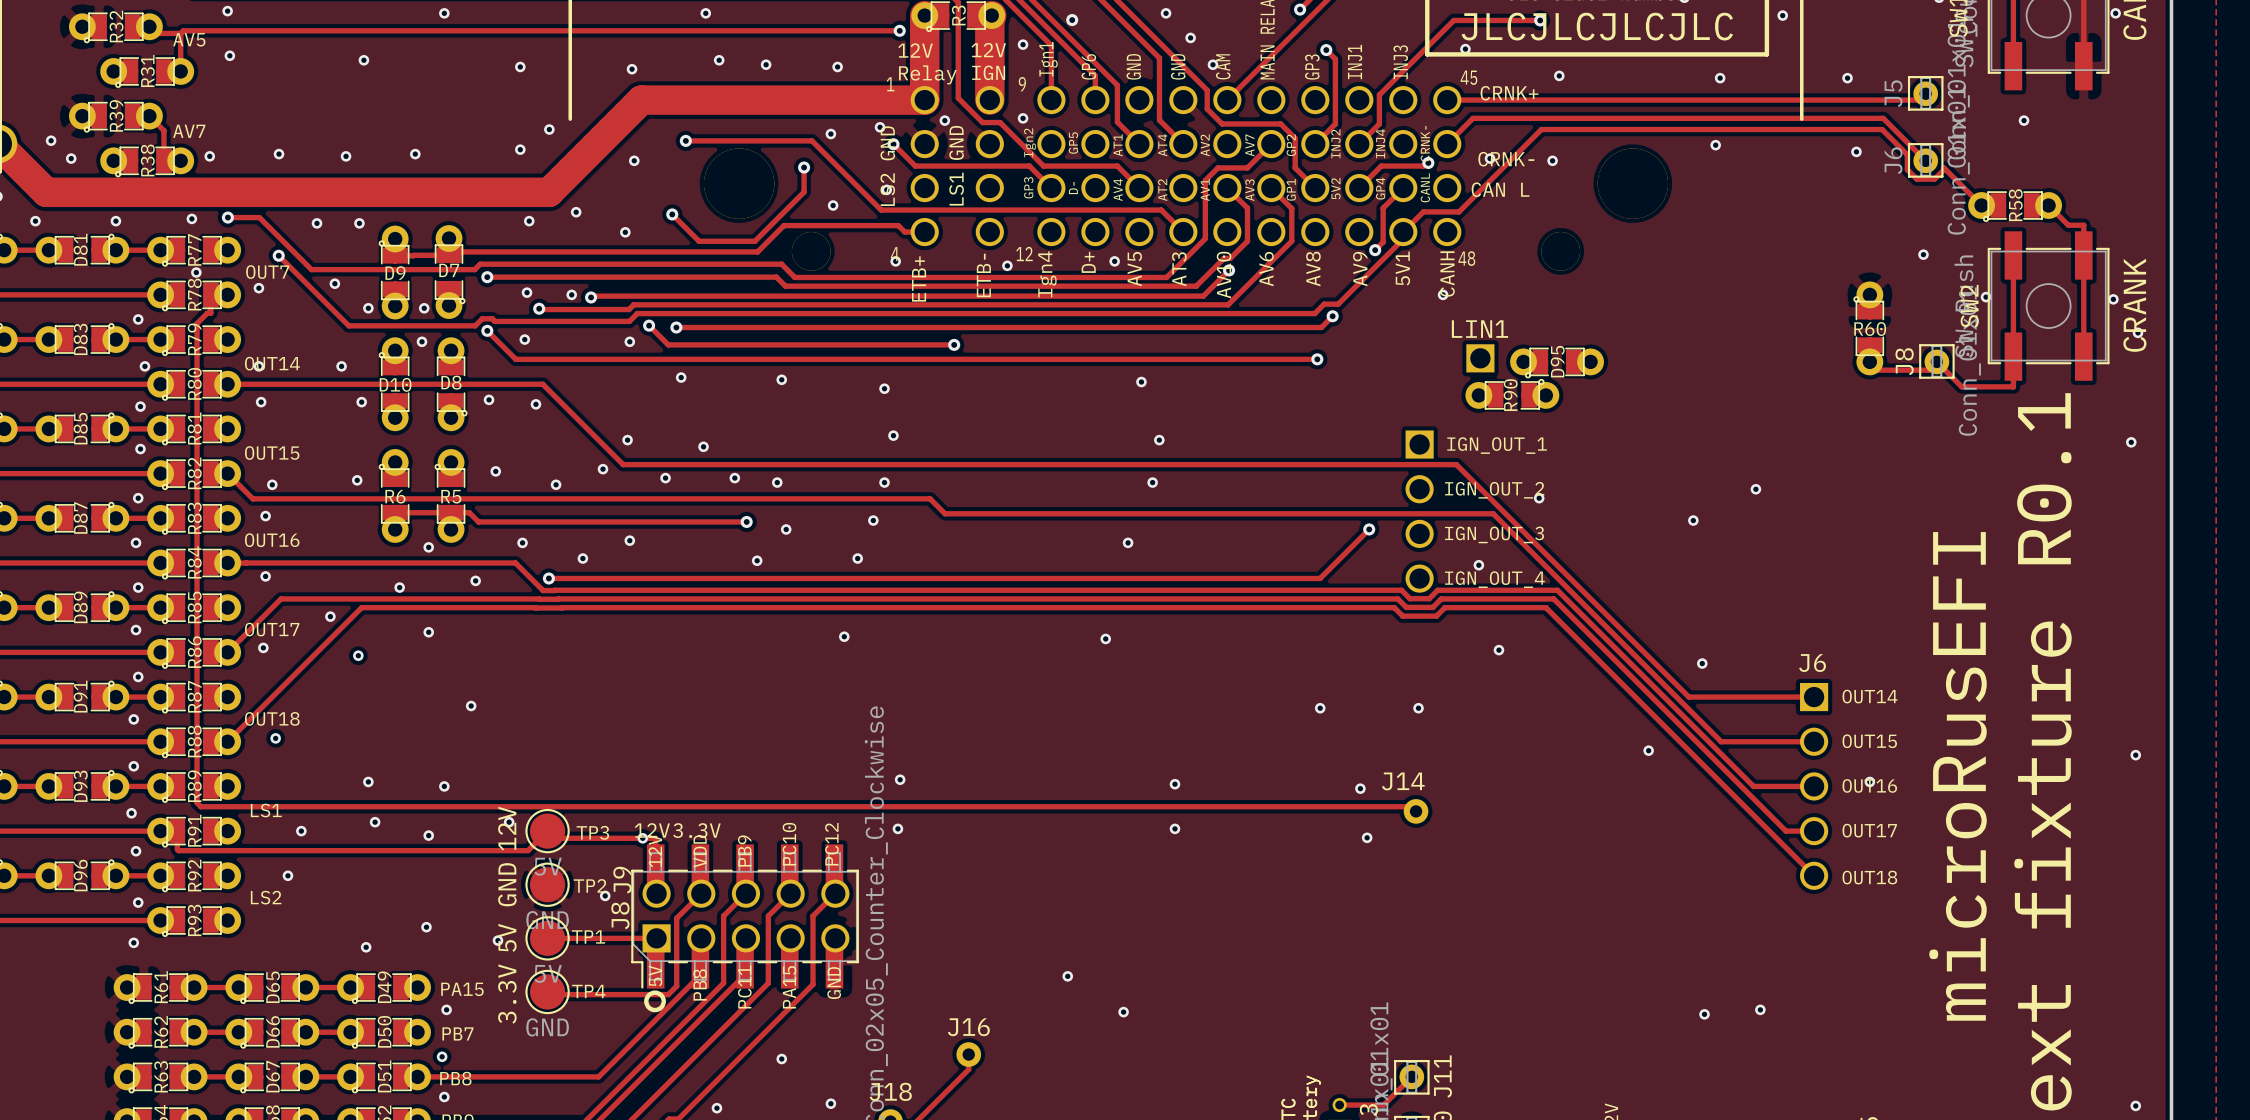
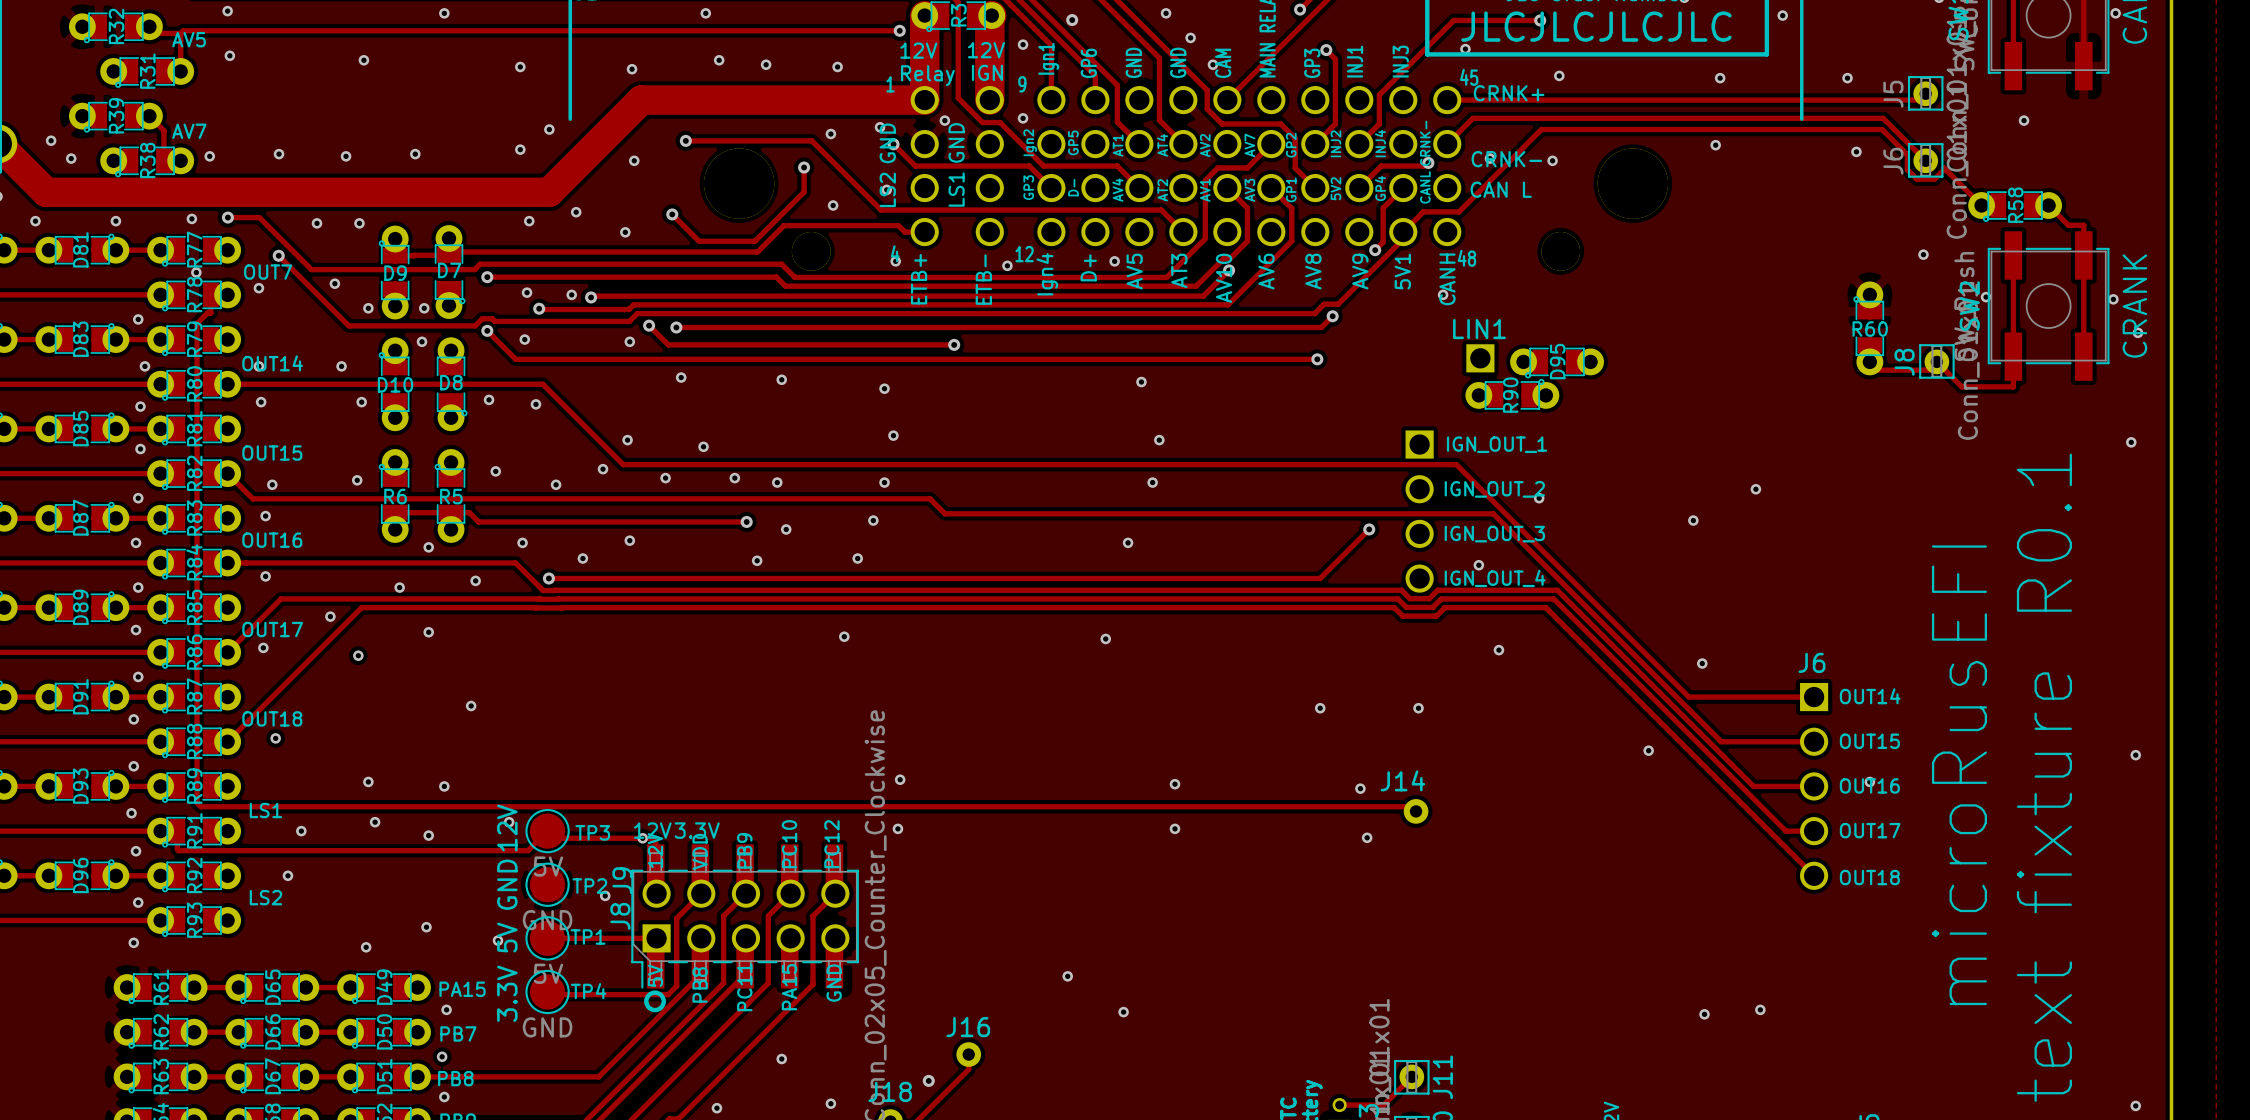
via: none -> (928, 1080)

